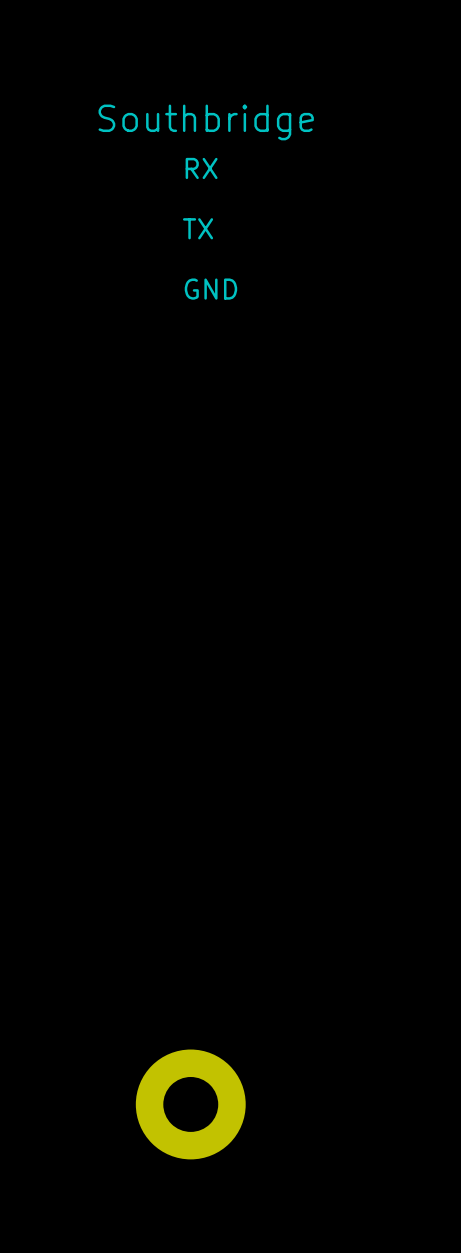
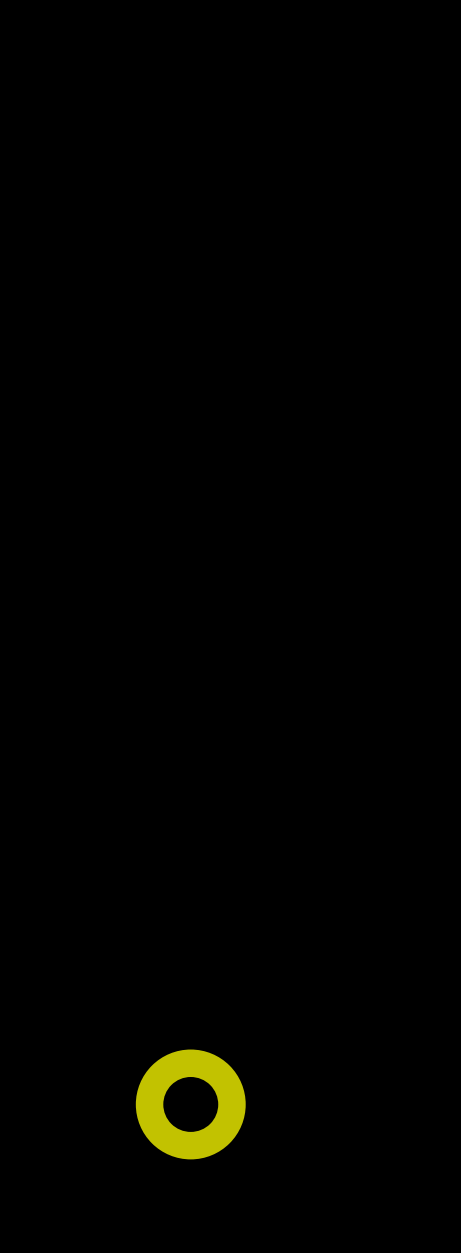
text: Southbridge (206, 122) -> none
text: RX (201, 168) -> none
text: TX (198, 228) -> none
text: GND (210, 289) -> none

